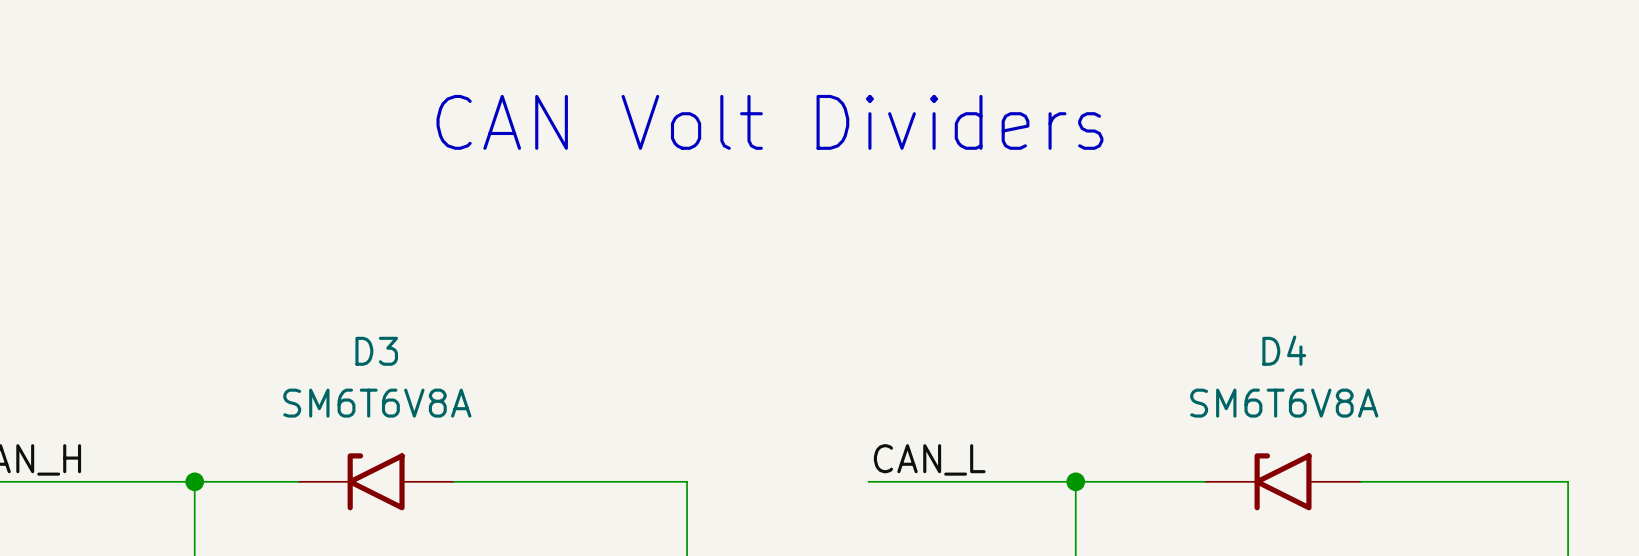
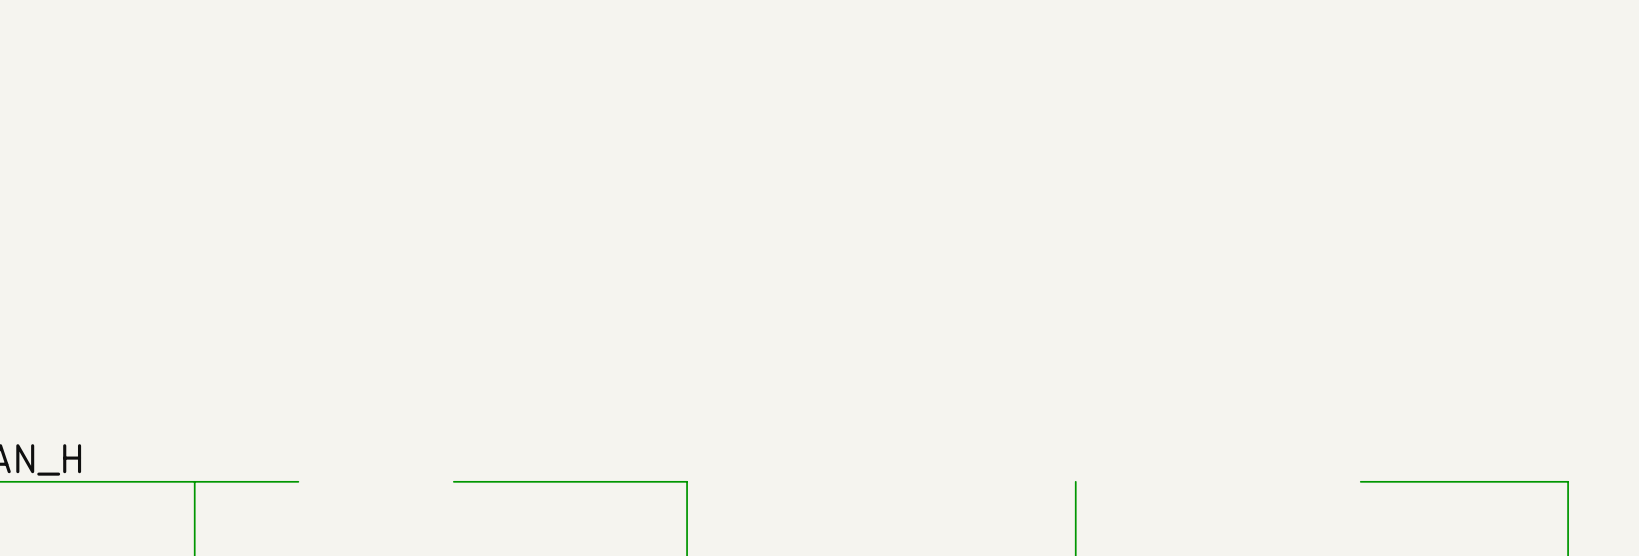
text: CAN Volt Dividers (769, 122) -> none
label: CAN_L (929, 459) -> none
junction: (194, 481) -> none
D3: SM6T6V8A (376, 481) -> none
wire: (868, 481) (1205, 481) -> none
junction: (1075, 481) -> none
D4: SM6T6V8A (1283, 481) -> none

